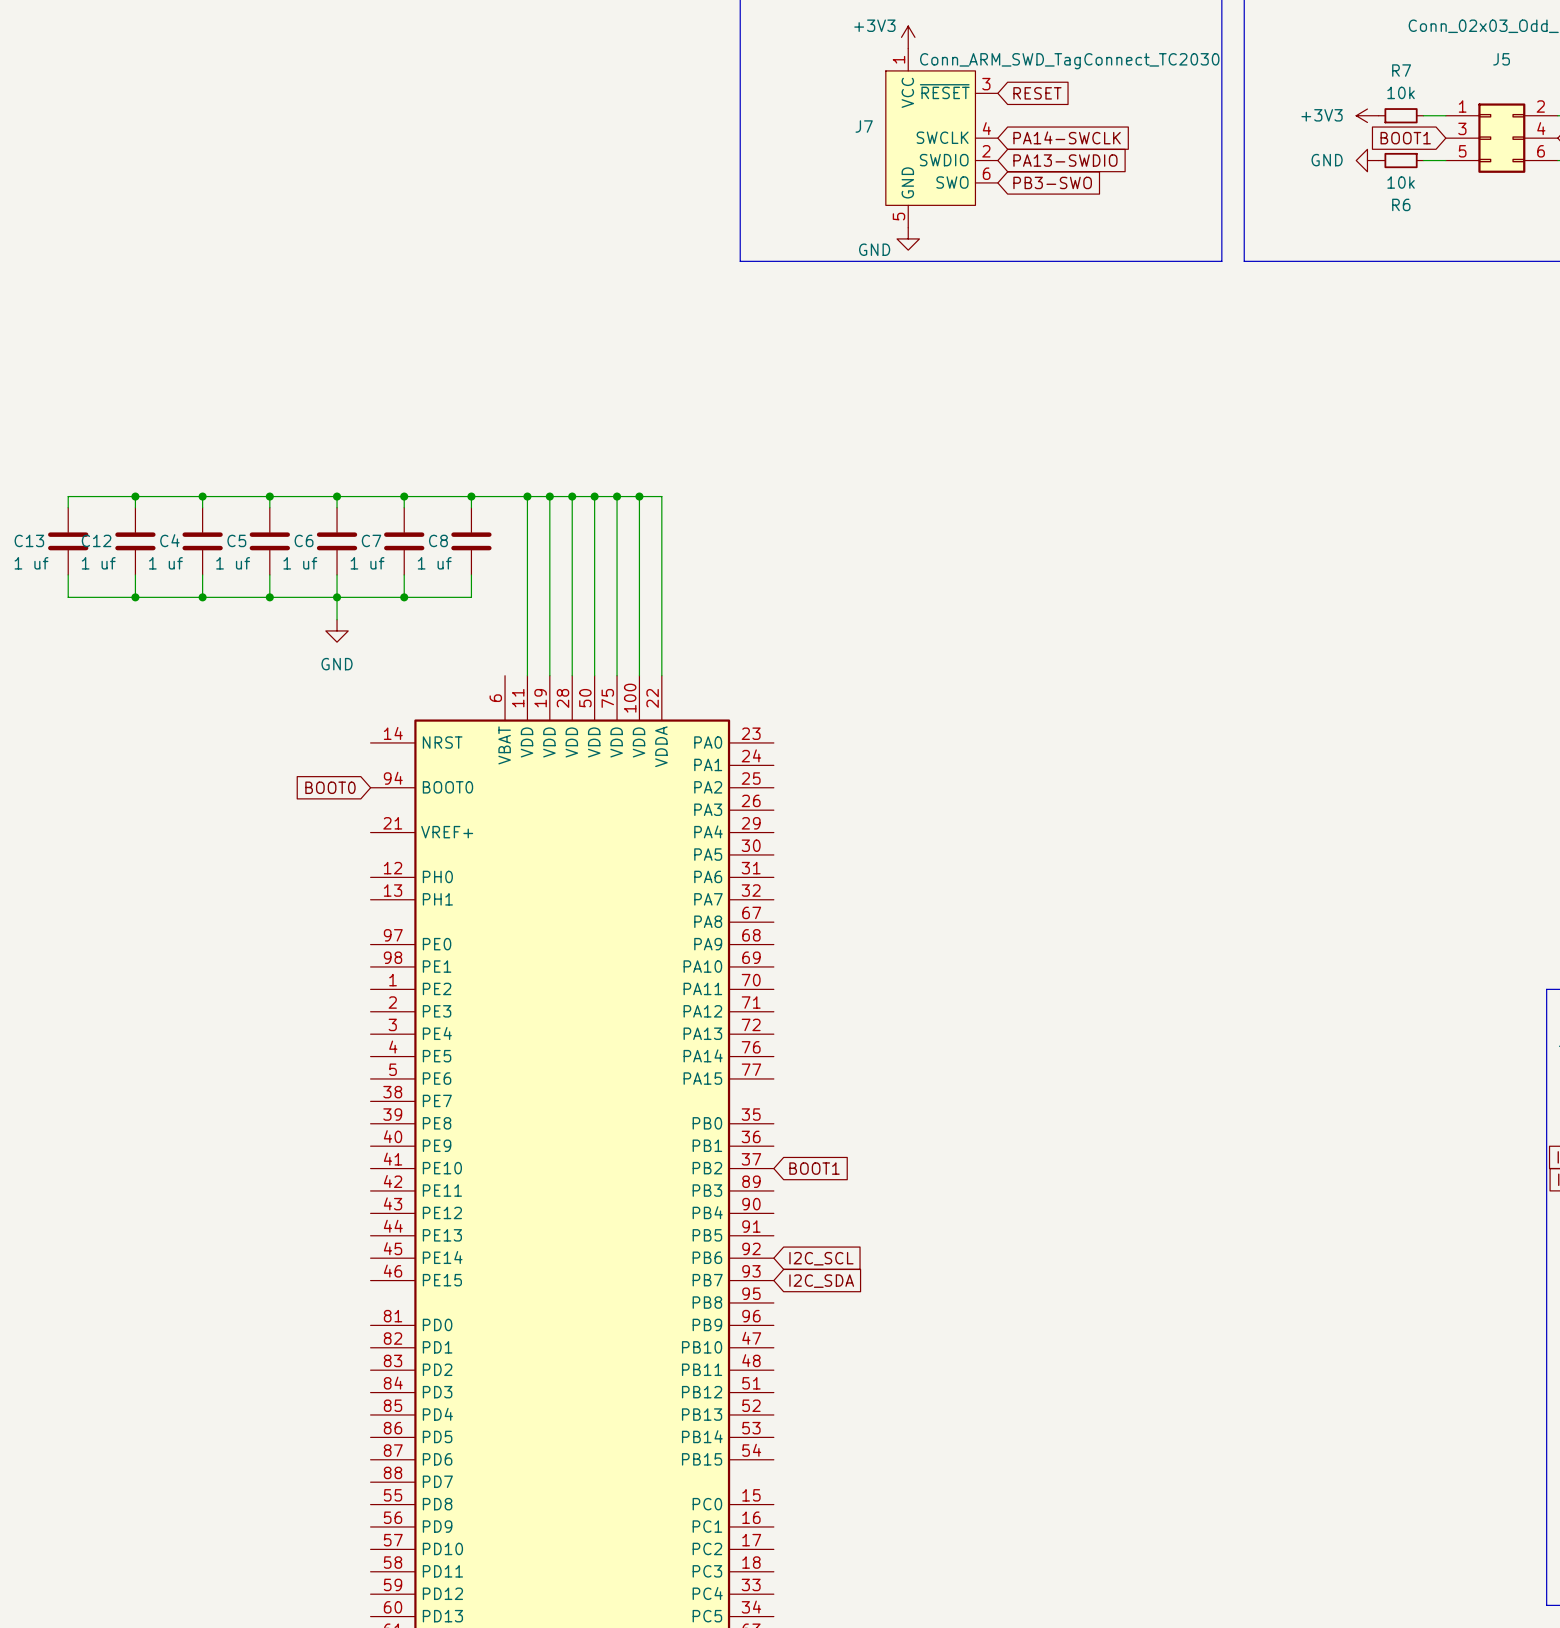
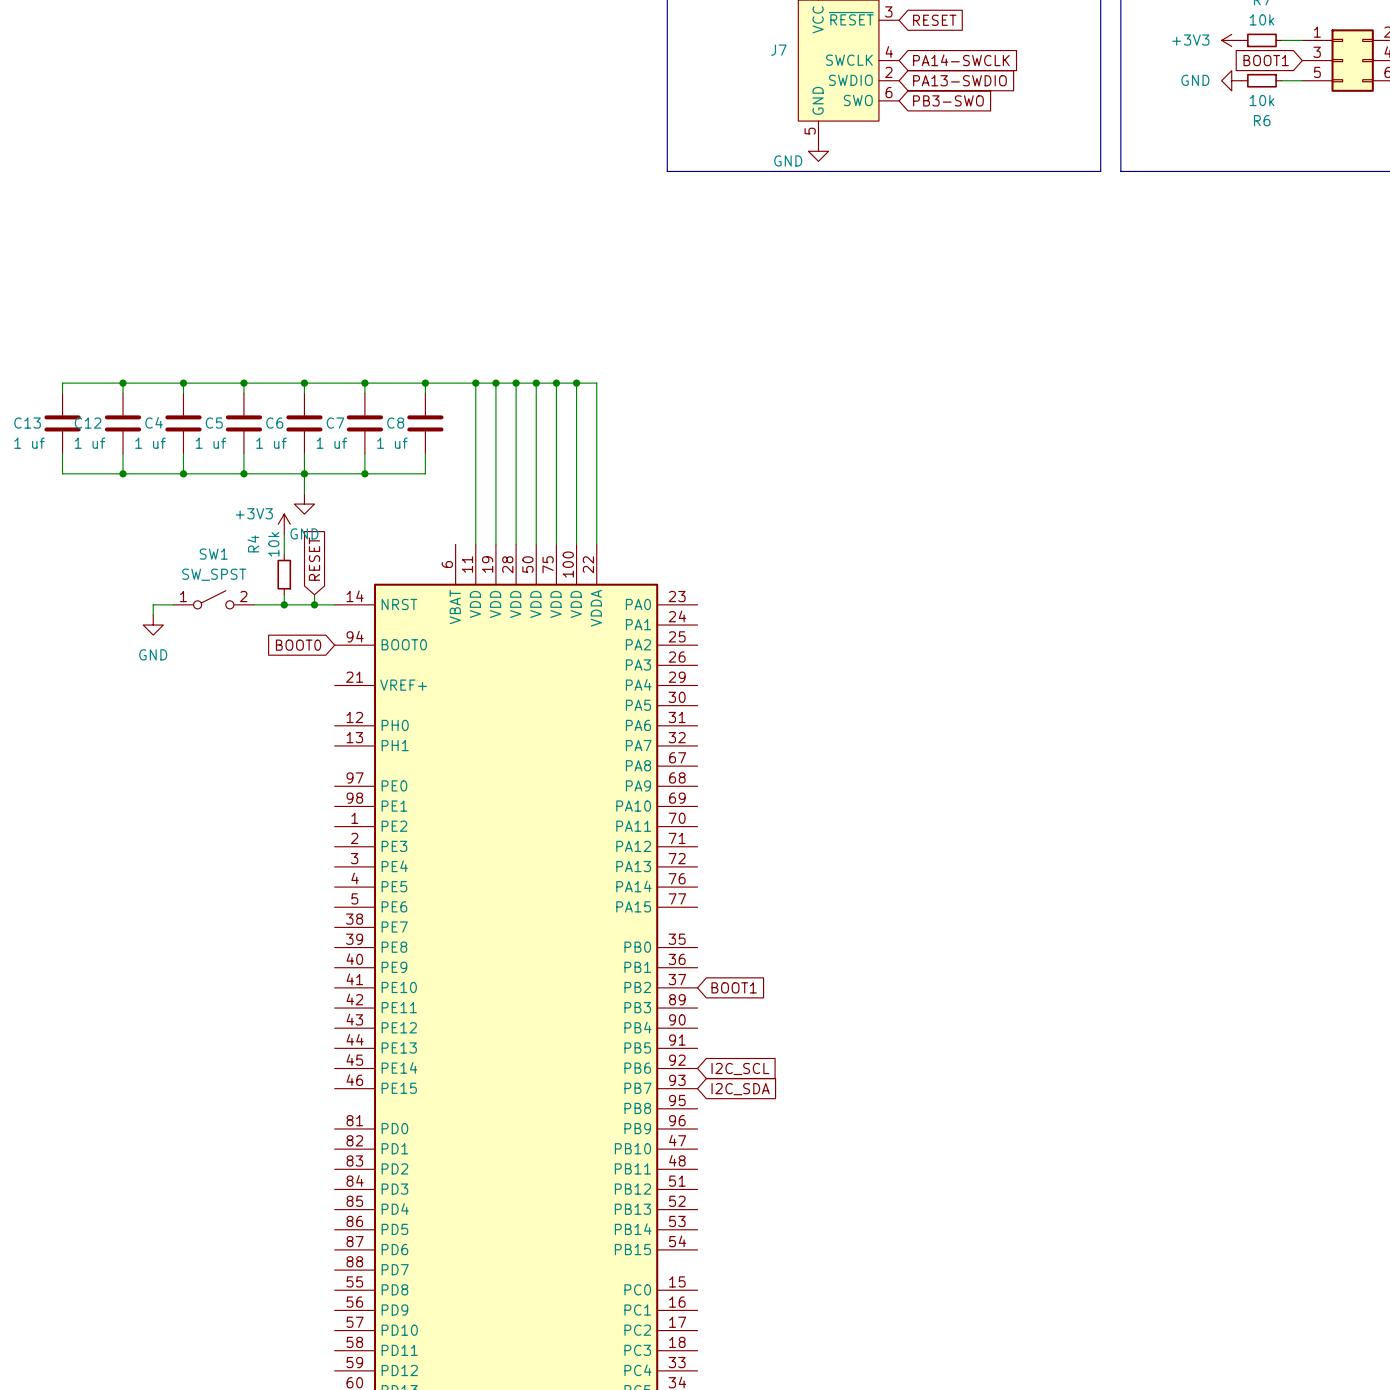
power symbol: none -> +3V3 (284, 524)
wire: none -> (284, 534) (284, 554)
global label: none -> RESET (314, 559)
R4: none -> 10k (284, 574)
wire: none -> (284, 594) (284, 604)
wire: none -> (314, 594) (314, 604)
SW1: none -> SW_SPST (213, 599)
wire: none -> (173, 604) (153, 604) (153, 614)
wire: none -> (254, 604) (334, 604)
junction: none -> (284, 604)
junction: none -> (314, 604)
power symbol: none -> GND (153, 625)

